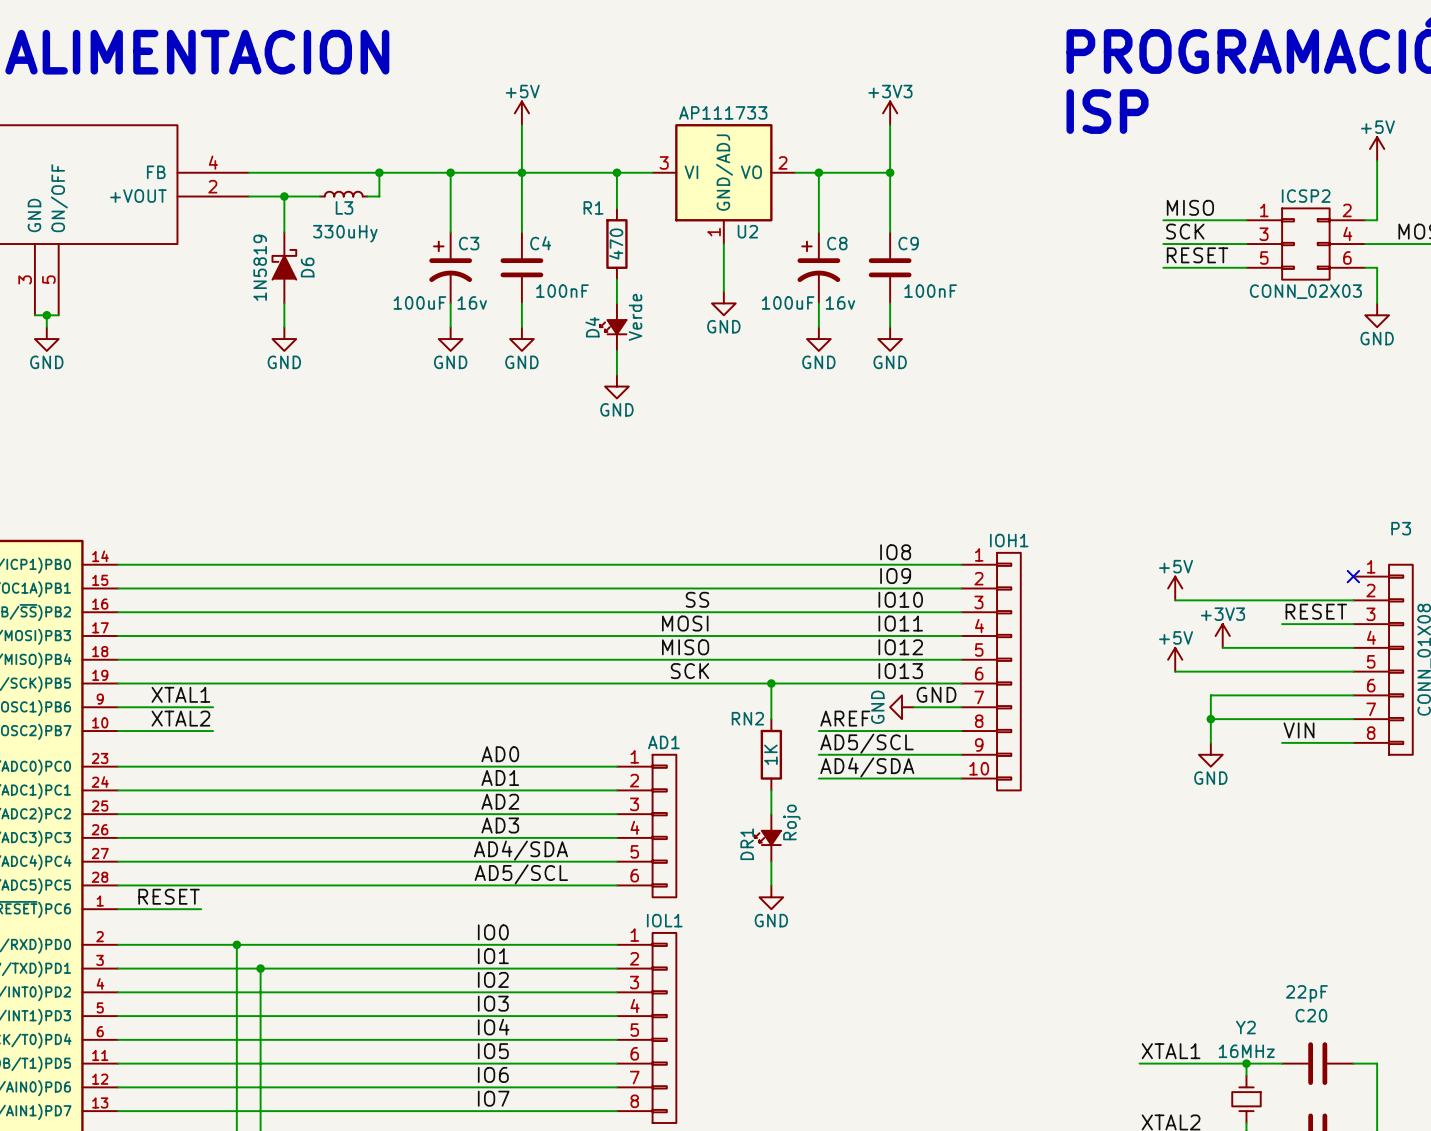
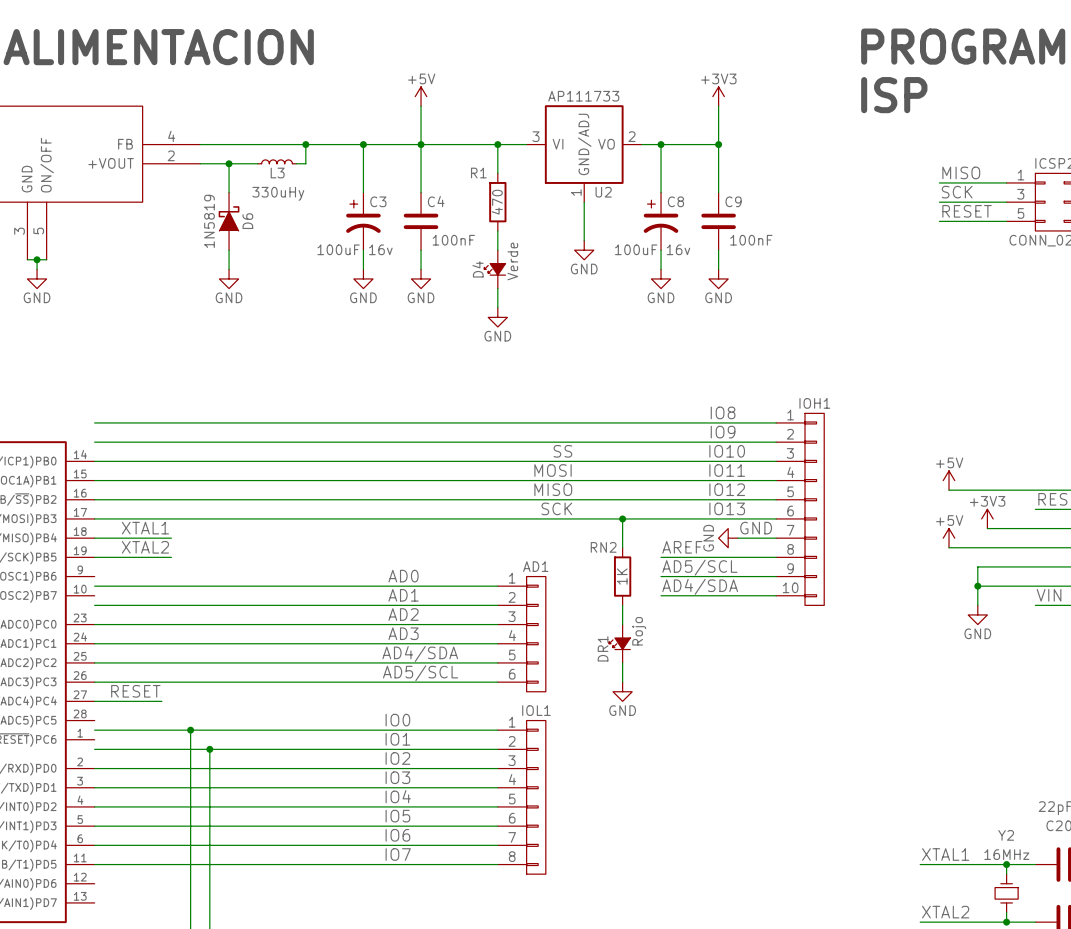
wire: none -> (94, 422) (776, 422)
wire: none -> (94, 442) (776, 442)
label: none -> SS (562, 451)
label position: IO8 (895, 552) -> IO8 (723, 412)
label: none -> IO10 (727, 451)
label: none -> MOSI (553, 470)
label position: IO9 (895, 576) -> IO9 (723, 432)
label: none -> IO11 (727, 470)
label: SS (697, 599) -> MISO (553, 489)
label: IO10 (900, 599) -> IO12 (727, 489)
label: MOSI (685, 623) -> SCK (556, 508)
label: IO11 (900, 623) -> IO13 (727, 508)
label: MISO (685, 647) -> none
label: IO12 (900, 647) -> none
wire: (213, 659) (913, 659) -> none
label: SCK (689, 671) -> none
label: none -> AREF (682, 547)
label: IO13 (900, 671) -> none
IOH1 position: (991, 671) -> (800, 509)
wire: (213, 683) (818, 683) -> none
wire: (771, 683) (771, 719) -> (622, 518) (622, 547)
junction position: (771, 683) -> (622, 518)
label position: XTAL1 (180, 694) -> XTAL1 (145, 528)
label position: GND (936, 694) -> GND (756, 528)
label: none -> AD0 (403, 576)
wire: (118, 707) (213, 707) -> none
wire: none -> (661, 576) (737, 576)
power symbol position: GND (902, 707) -> GND (728, 538)
label position: XTAL2 (180, 718) -> XTAL2 (145, 547)
label: AREF (845, 718) -> AD4/SDA (700, 586)
label: none -> AD1 (403, 595)
wire: (118, 731) (213, 731) -> none
wire: none -> (94, 605) (497, 605)
label position: AD5/SCL (866, 743) -> AD5/SCL (699, 567)
label: AD0 (500, 754) -> AD2 (403, 614)
RN2 position: (771, 754) -> (622, 576)
wire: (818, 754) (961, 754) -> none
label: AD4/SDA (867, 767) -> none
label: AD1 (500, 777) -> AD3 (403, 633)
wire: (818, 778) (961, 778) -> none
label: AD2 (500, 801) -> none
label: AD3 (500, 825) -> none
AD1 position: (646, 826) -> (521, 634)
DR1 position: (767, 837) -> (619, 643)
label position: AD4/SDA (520, 850) -> AD4/SDA (420, 654)
wire: (201, 861) (616, 861) -> none
wire: (771, 861) (771, 885) -> (622, 605) (622, 624)
label position: AD5/SCL (521, 874) -> AD5/SCL (420, 673)
label: none -> IO0 (397, 720)
wire: (118, 885) (616, 885) -> (94, 586) (497, 586)
label position: RESET (169, 896) -> RESET (135, 691)
wire: none -> (190, 730) (190, 768)
junction: none -> (190, 730)
power symbol position: GND (771, 897) -> GND (622, 691)
label: none -> IO1 (397, 739)
wire: (118, 909) (201, 909) -> none
wire: none -> (209, 749) (209, 787)
junction: none -> (209, 749)
label: IO0 (493, 932) -> IO2 (397, 758)
junction: (236, 944) -> none
label: IO1 (493, 956) -> IO3 (397, 777)
junction: (260, 968) -> none
label: IO2 (493, 979) -> IO4 (398, 796)
label: IO3 (493, 1003) -> IO5 (397, 816)
label: IO4 (493, 1027) -> IO6 (397, 835)
IOL1 position: (646, 1027) -> (521, 797)
label: IO5 (493, 1051) -> IO7 (398, 854)
label: IO6 (493, 1074) -> none
wire: (118, 1087) (616, 1087) -> (94, 749) (497, 749)
label: IO7 (493, 1098) -> none
wire: (118, 1111) (616, 1111) -> (94, 730) (497, 730)

